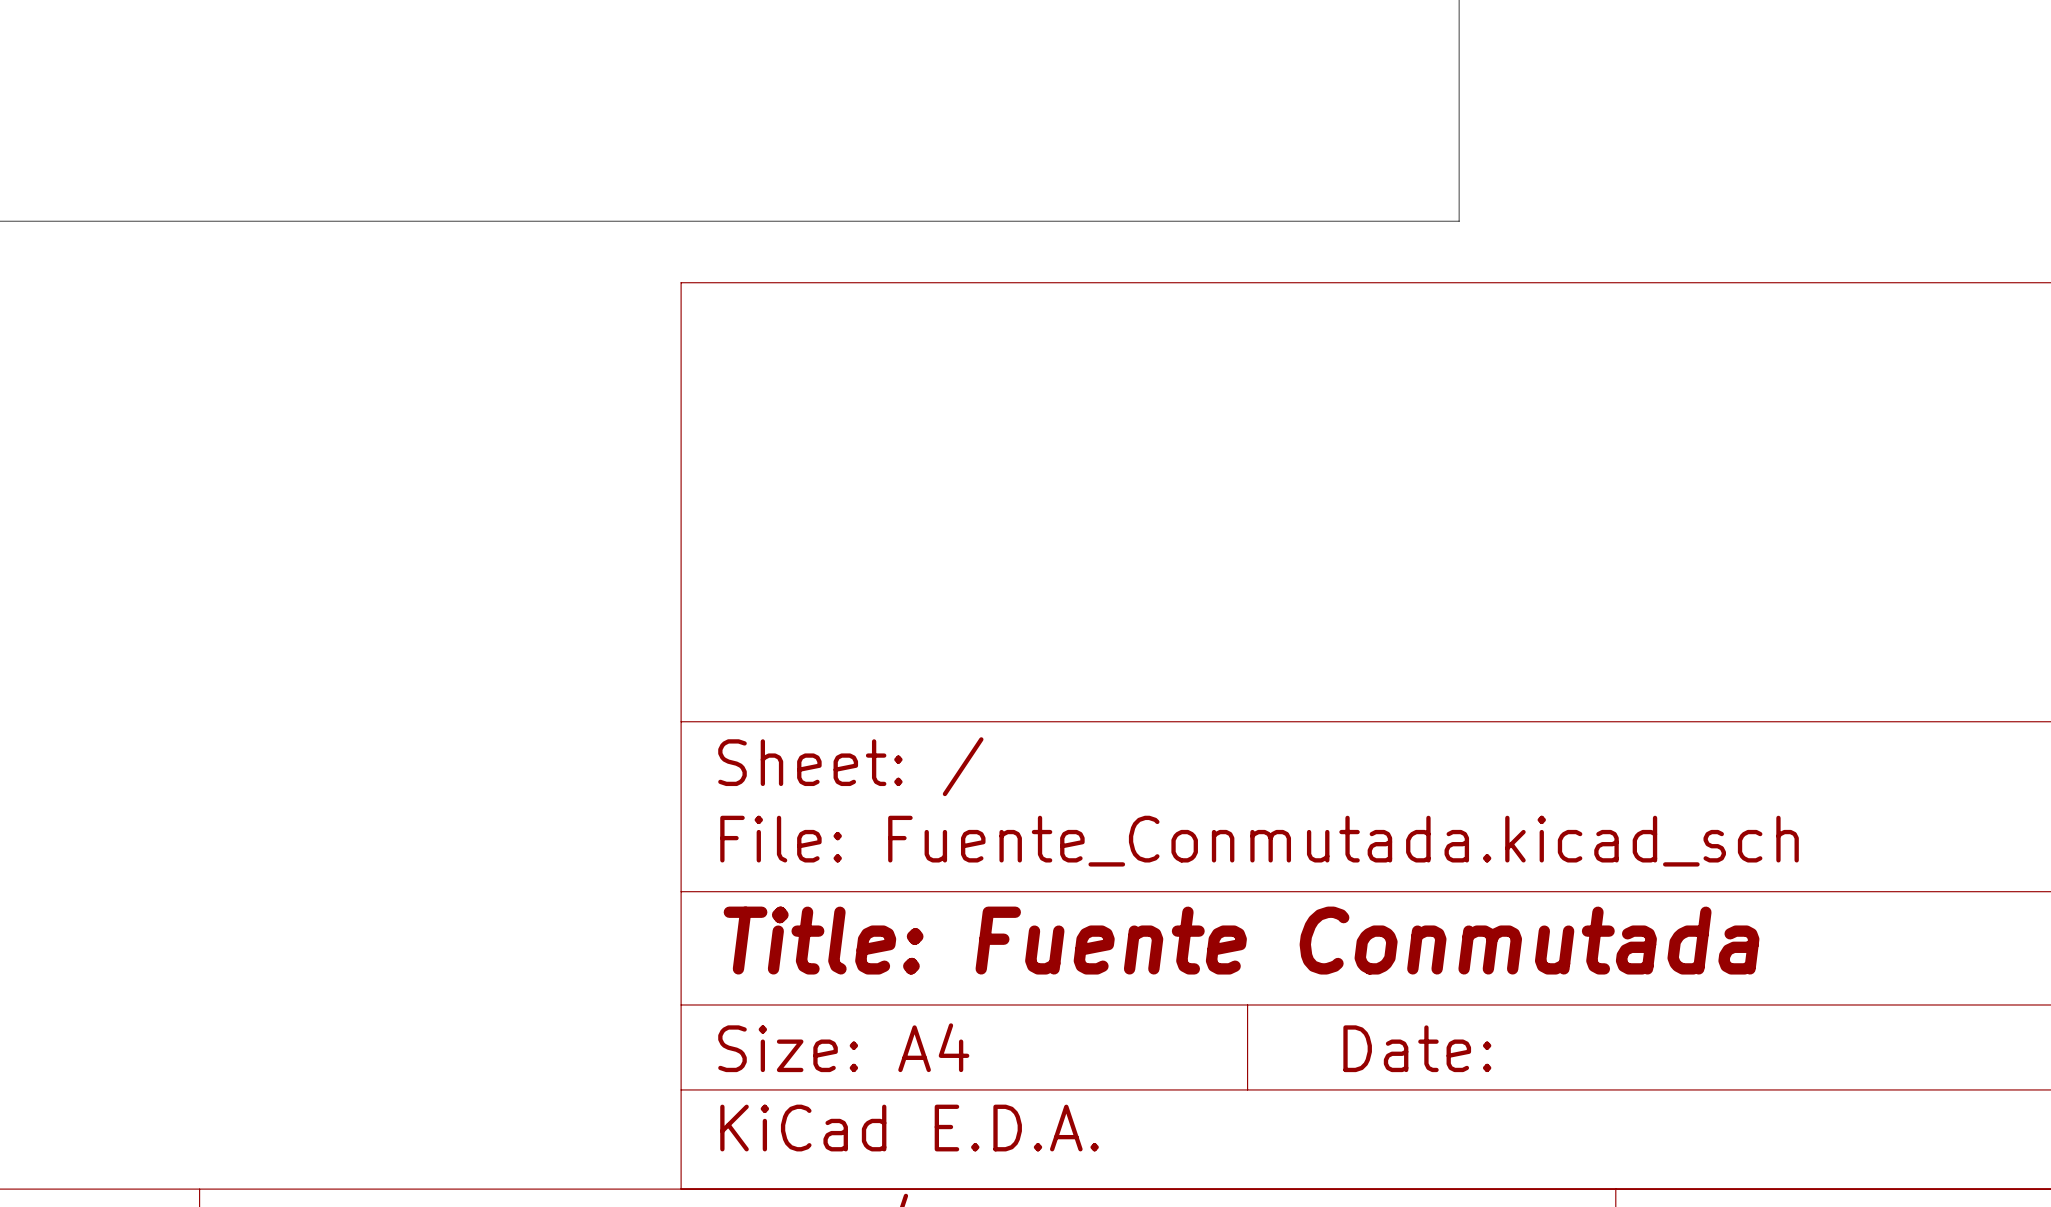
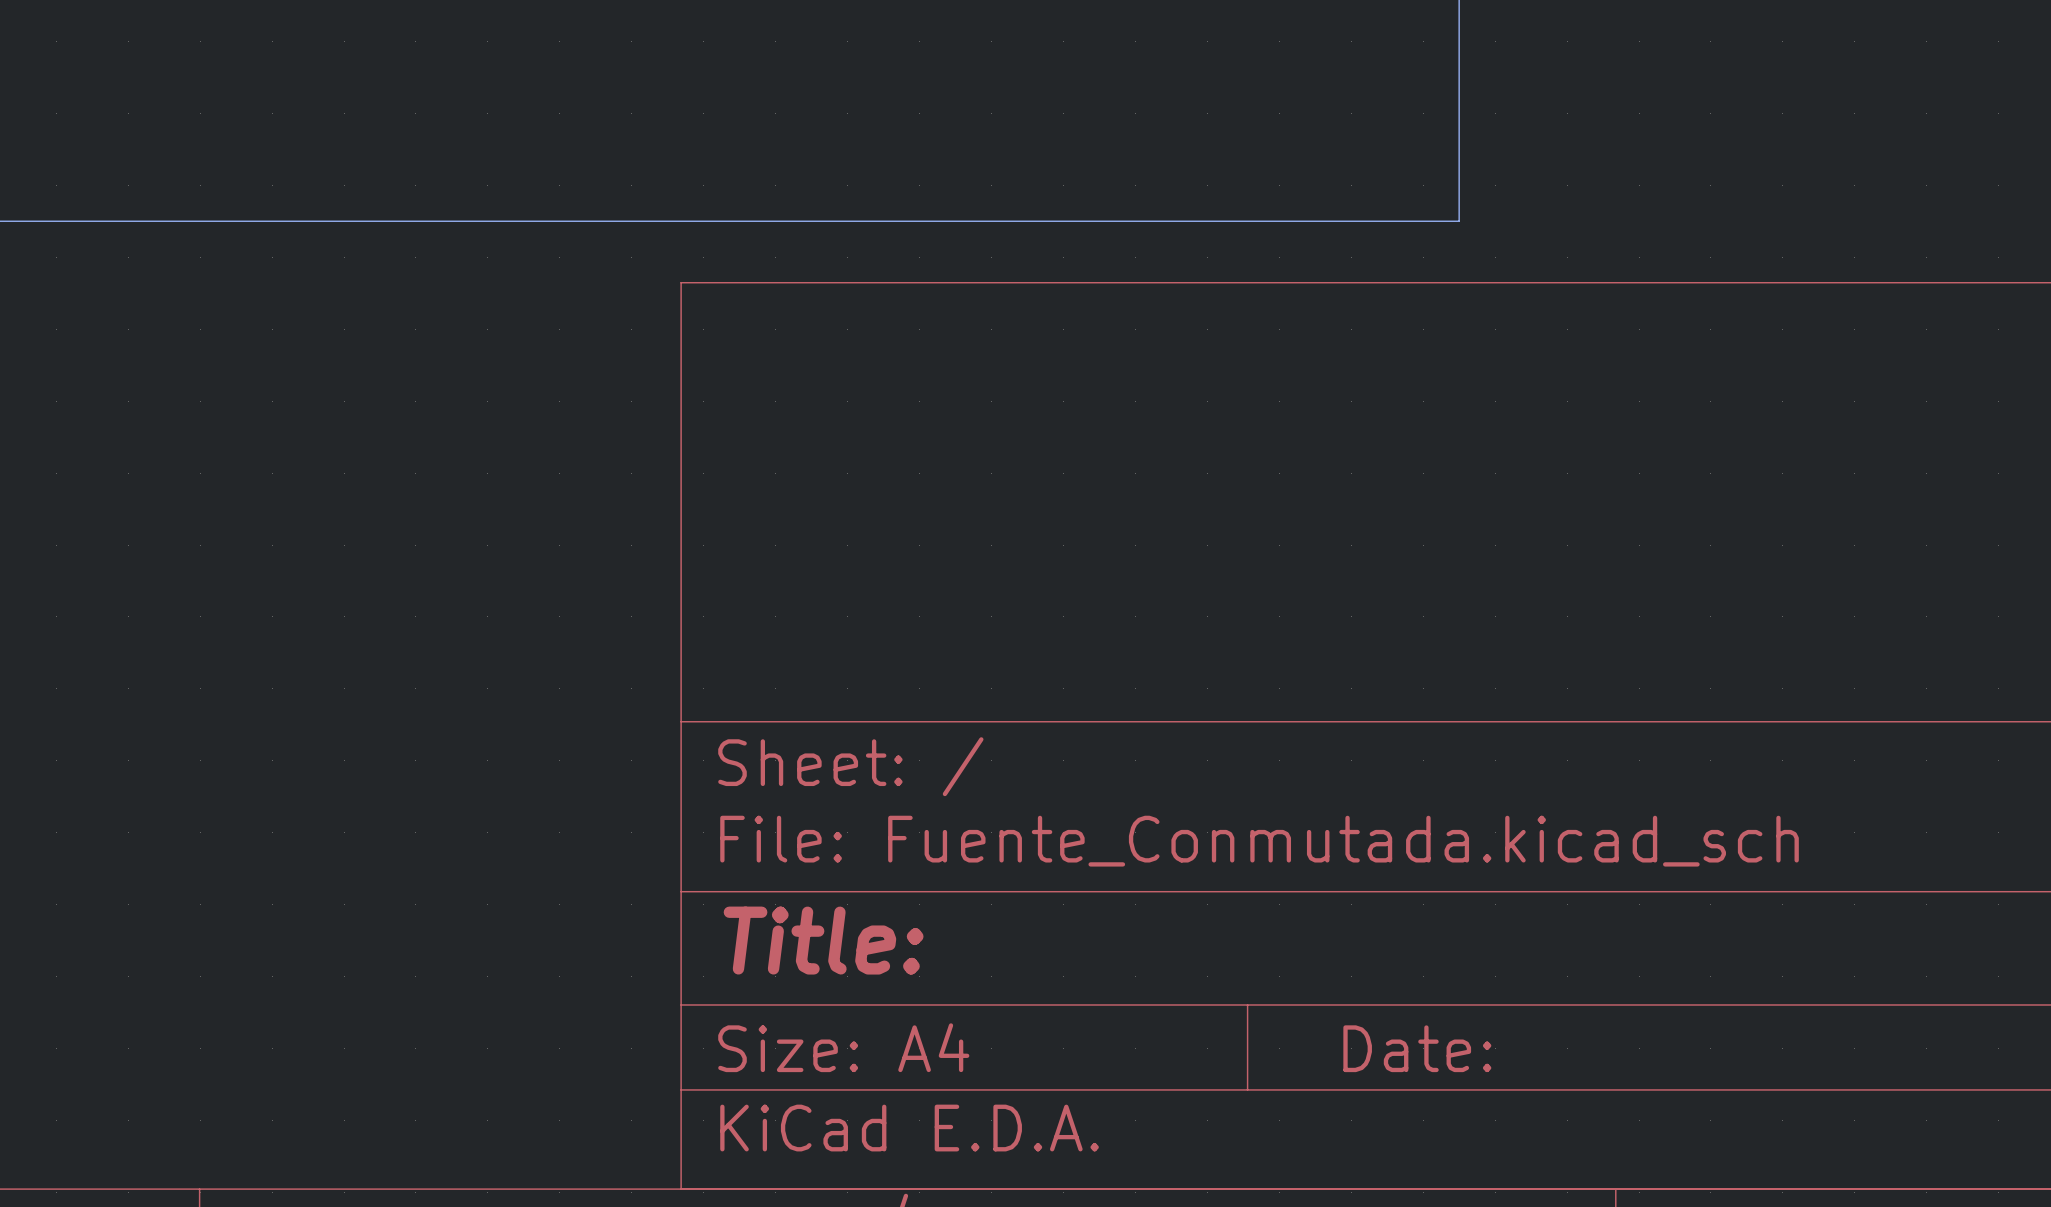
title block: Title: Fuente Conmutada (1241, 940) -> Title: (823, 940)

